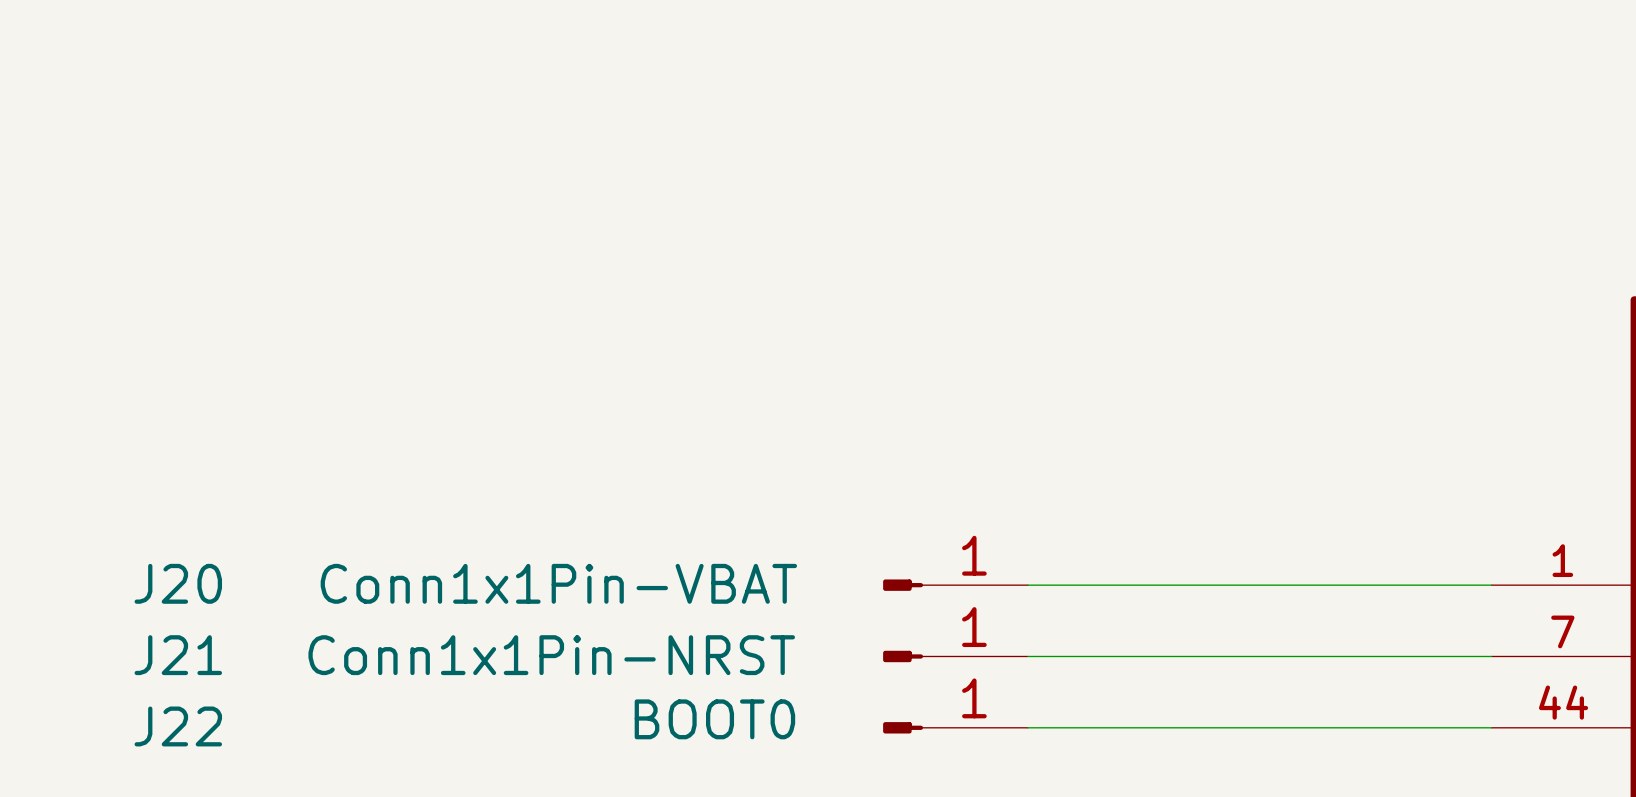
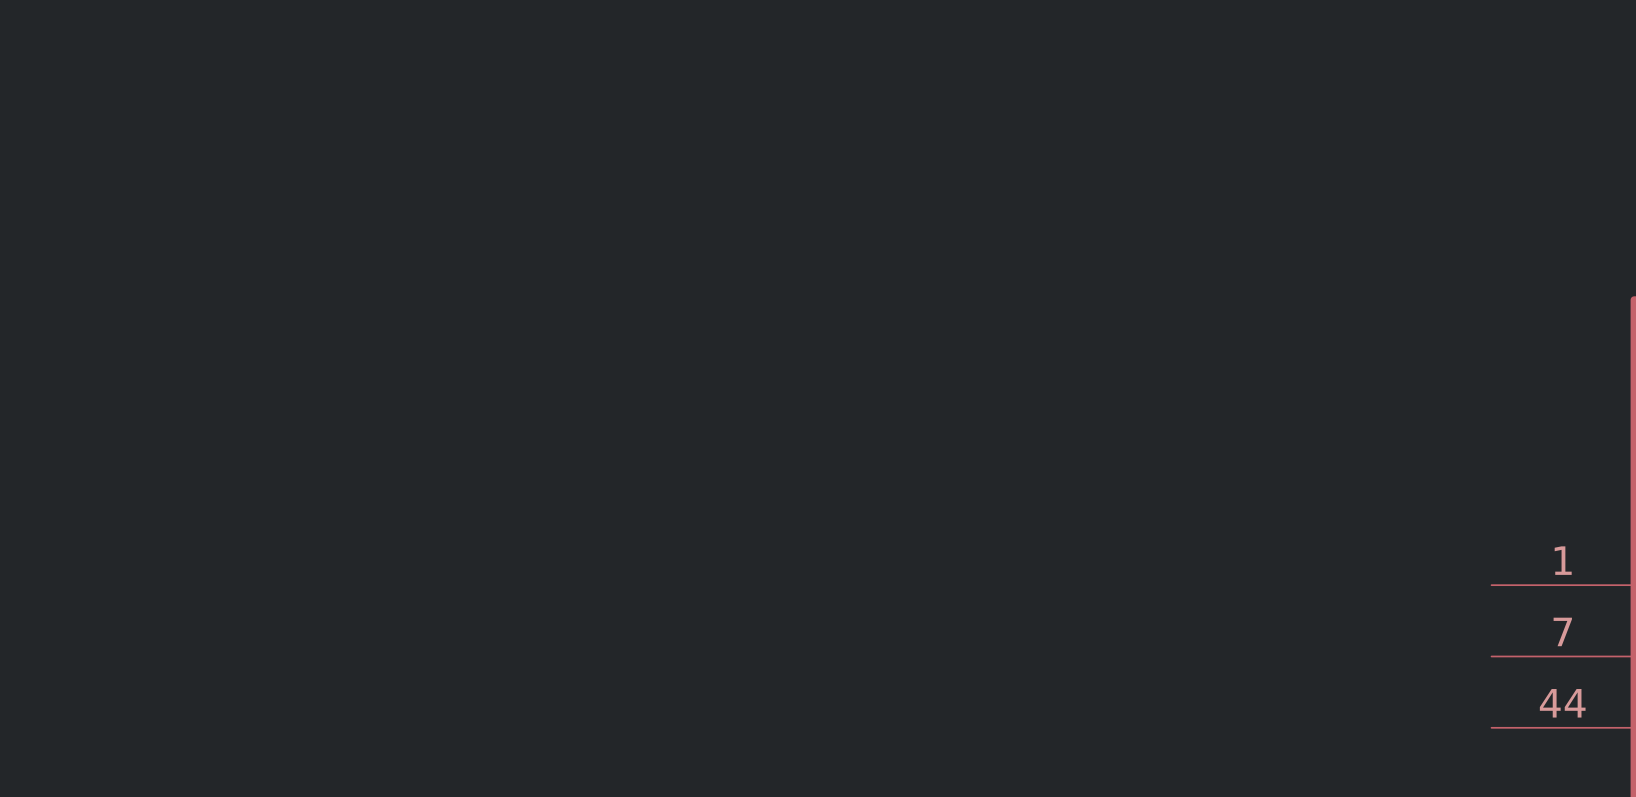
J20: Conn1x1Pin-VBAT (955, 585) -> none
wire: (1027, 585) (1491, 585) -> none
J21: Conn1x1Pin-NRST (955, 656) -> none
wire: (1027, 656) (1491, 656) -> none
J22: BOOT0 (955, 727) -> none
wire: (1027, 727) (1491, 727) -> none

